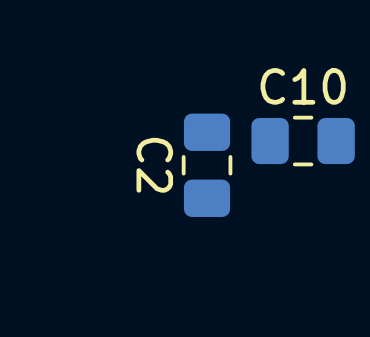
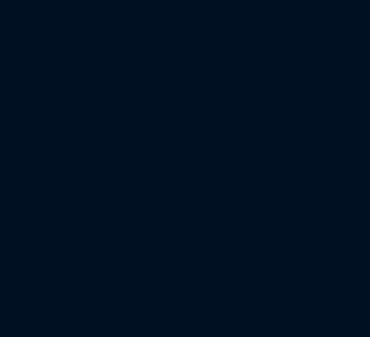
C10: (303, 141) -> none
C2: (207, 165) -> none

